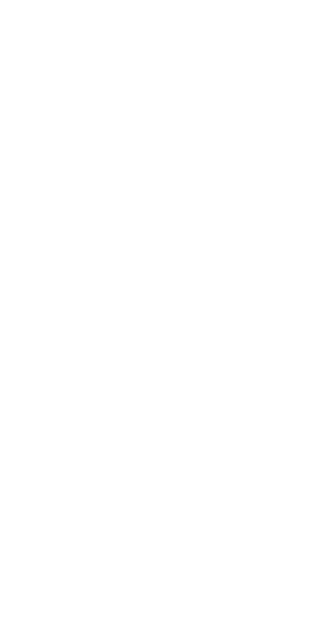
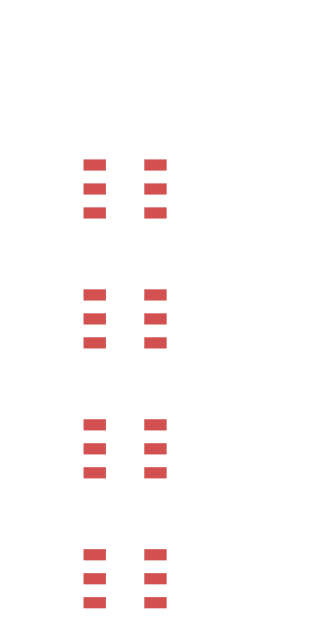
part: none -> (125, 188)
part: none -> (125, 318)
part: none -> (125, 448)
part: none -> (125, 578)

